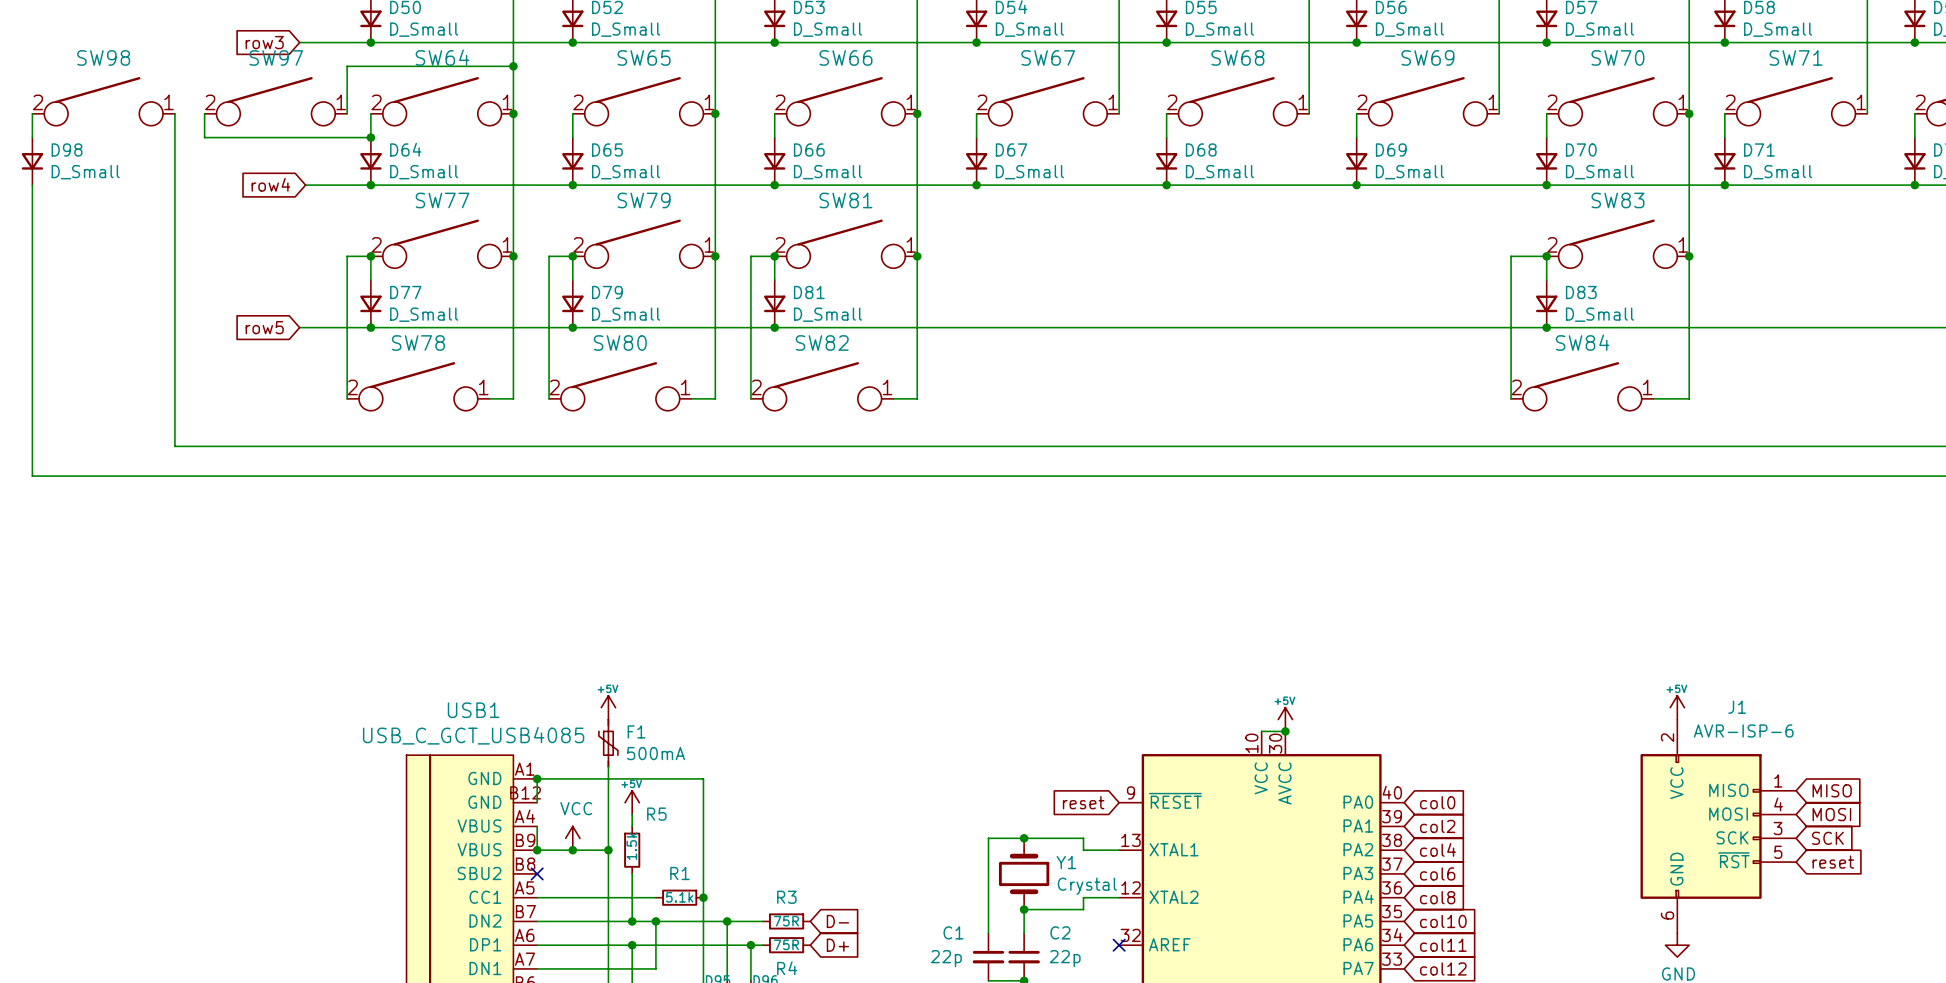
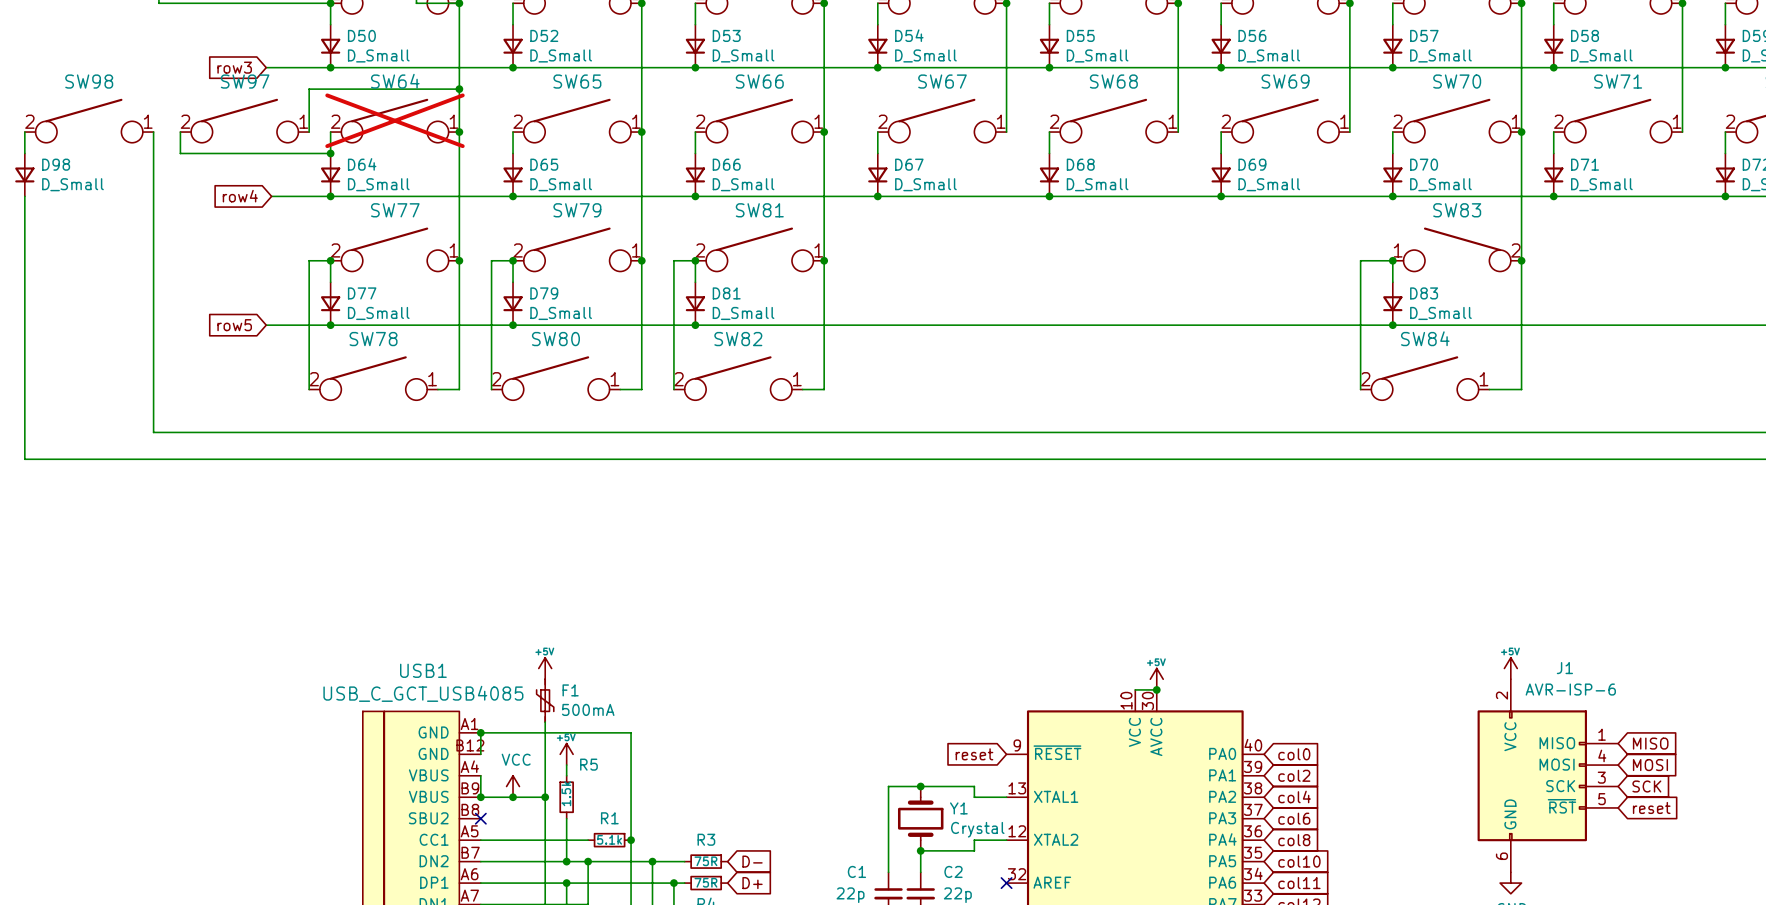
SW64 do-not-place cross: none -> (394, 120)
SW83 flip: as is (1617, 243) -> left-right (1457, 249)

